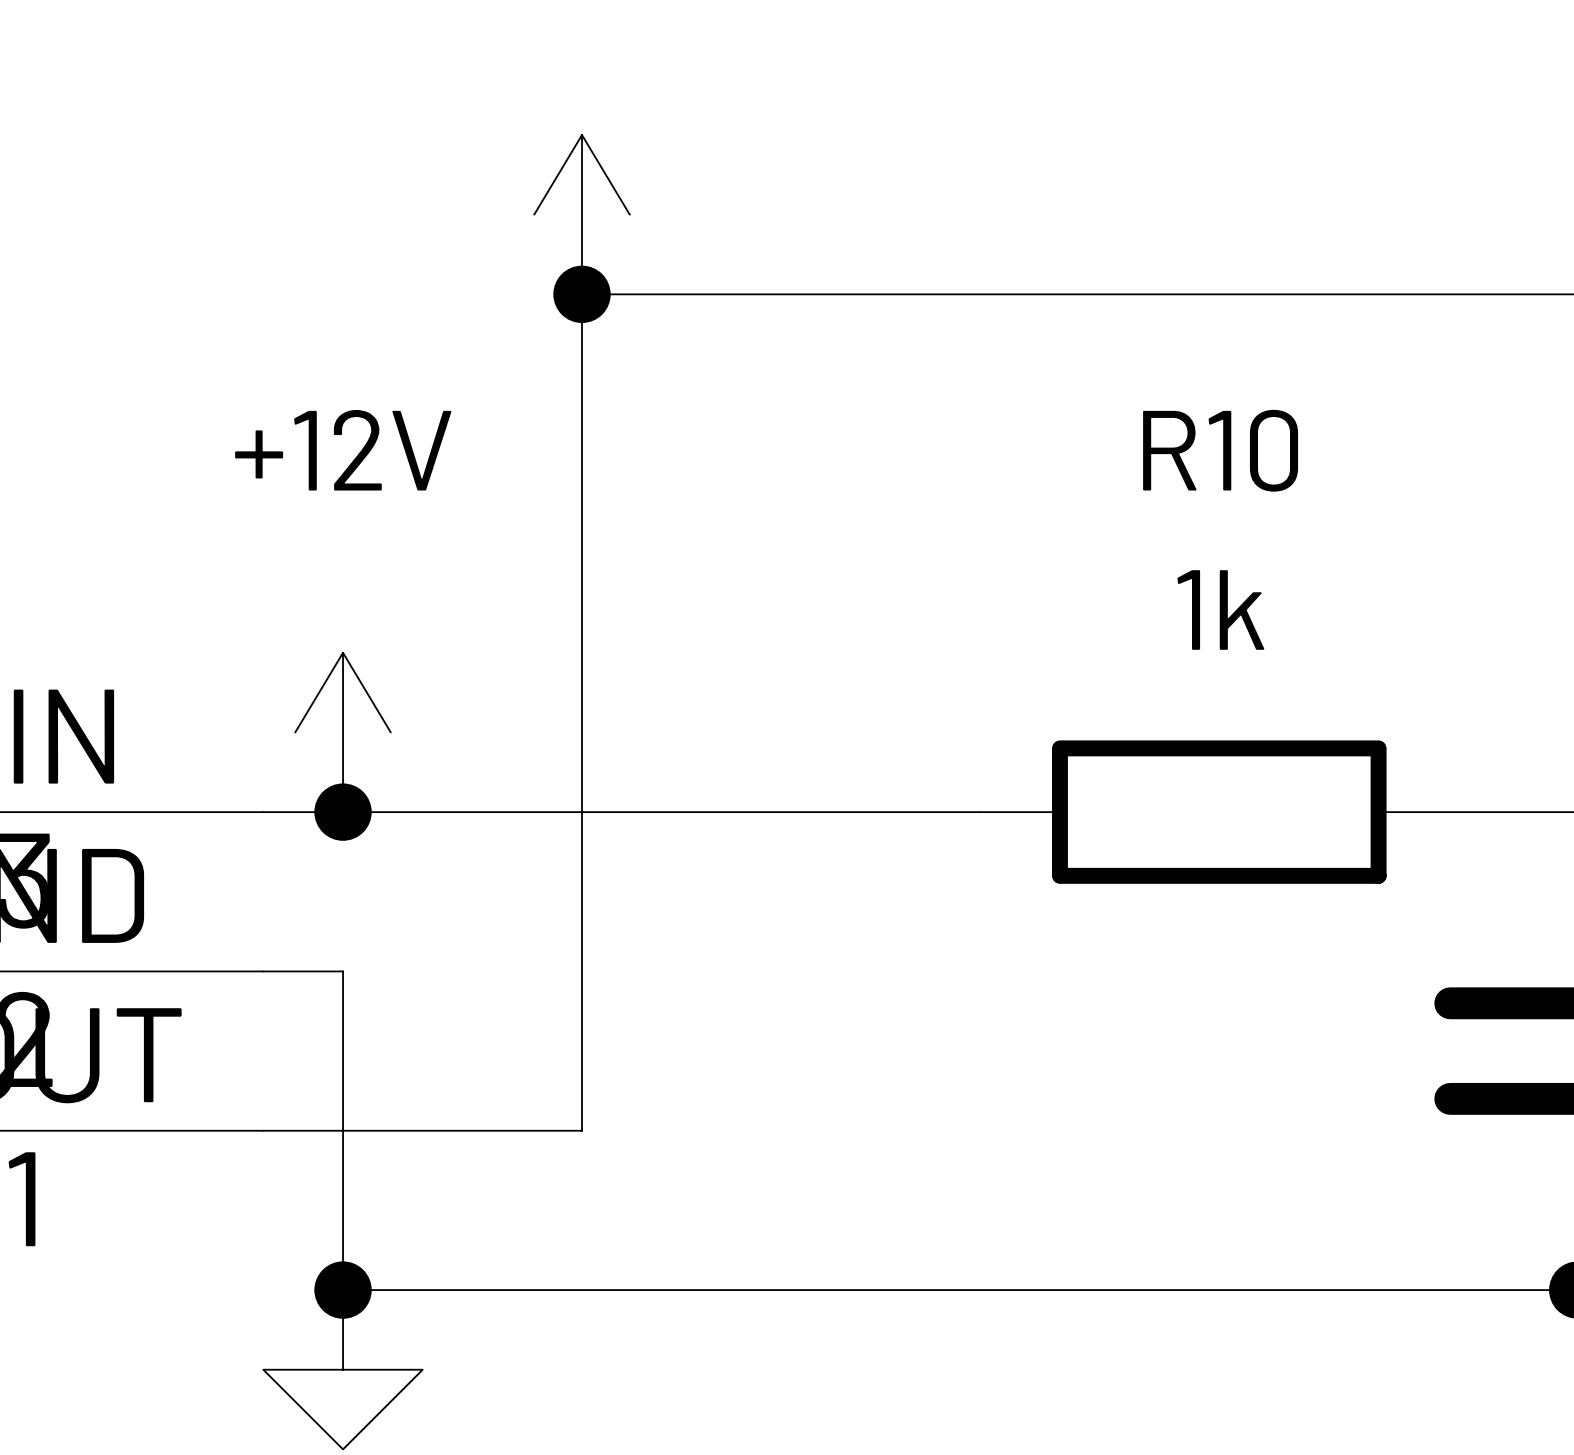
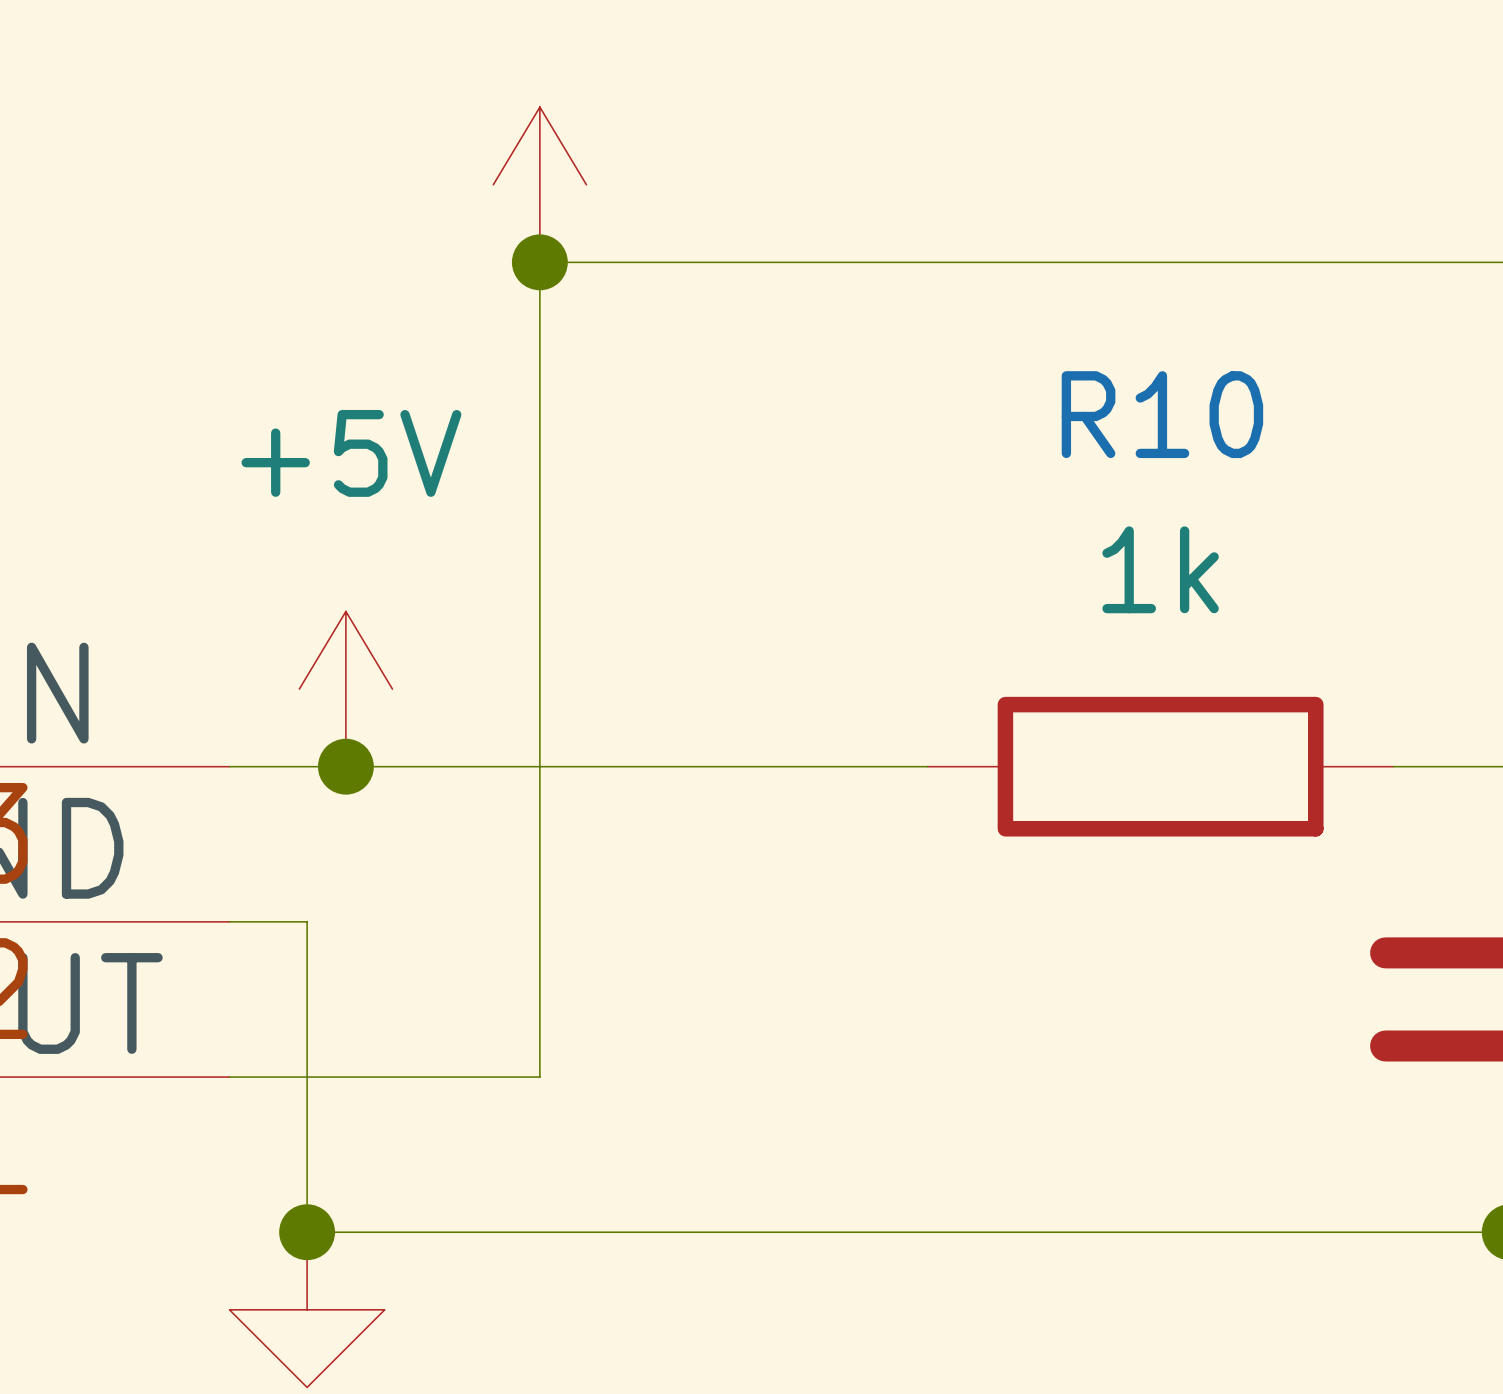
power symbol: +12V (343, 732) -> +5V (345, 689)
junction position: (343, 812) -> (345, 766)

